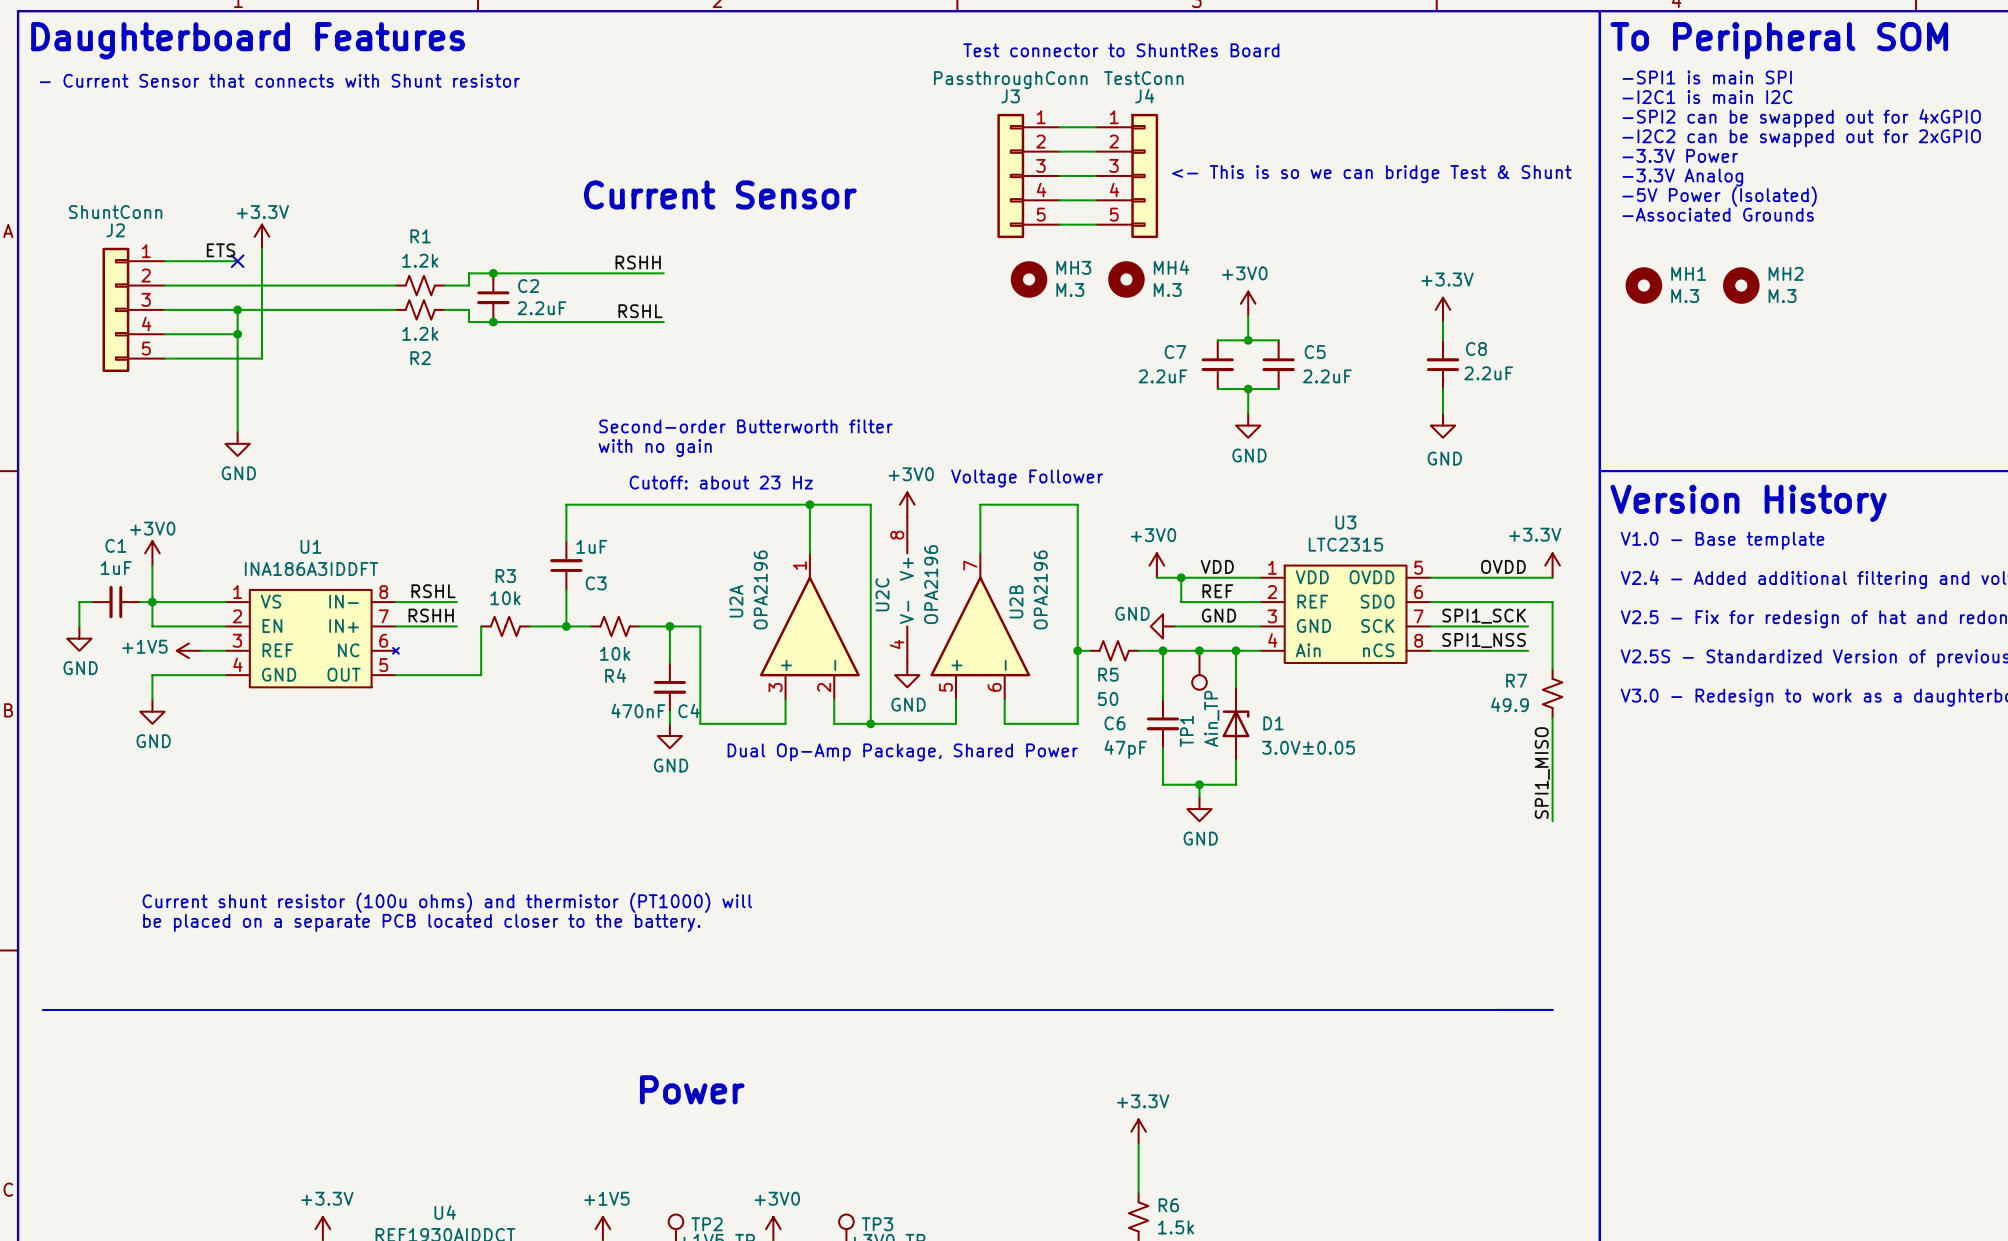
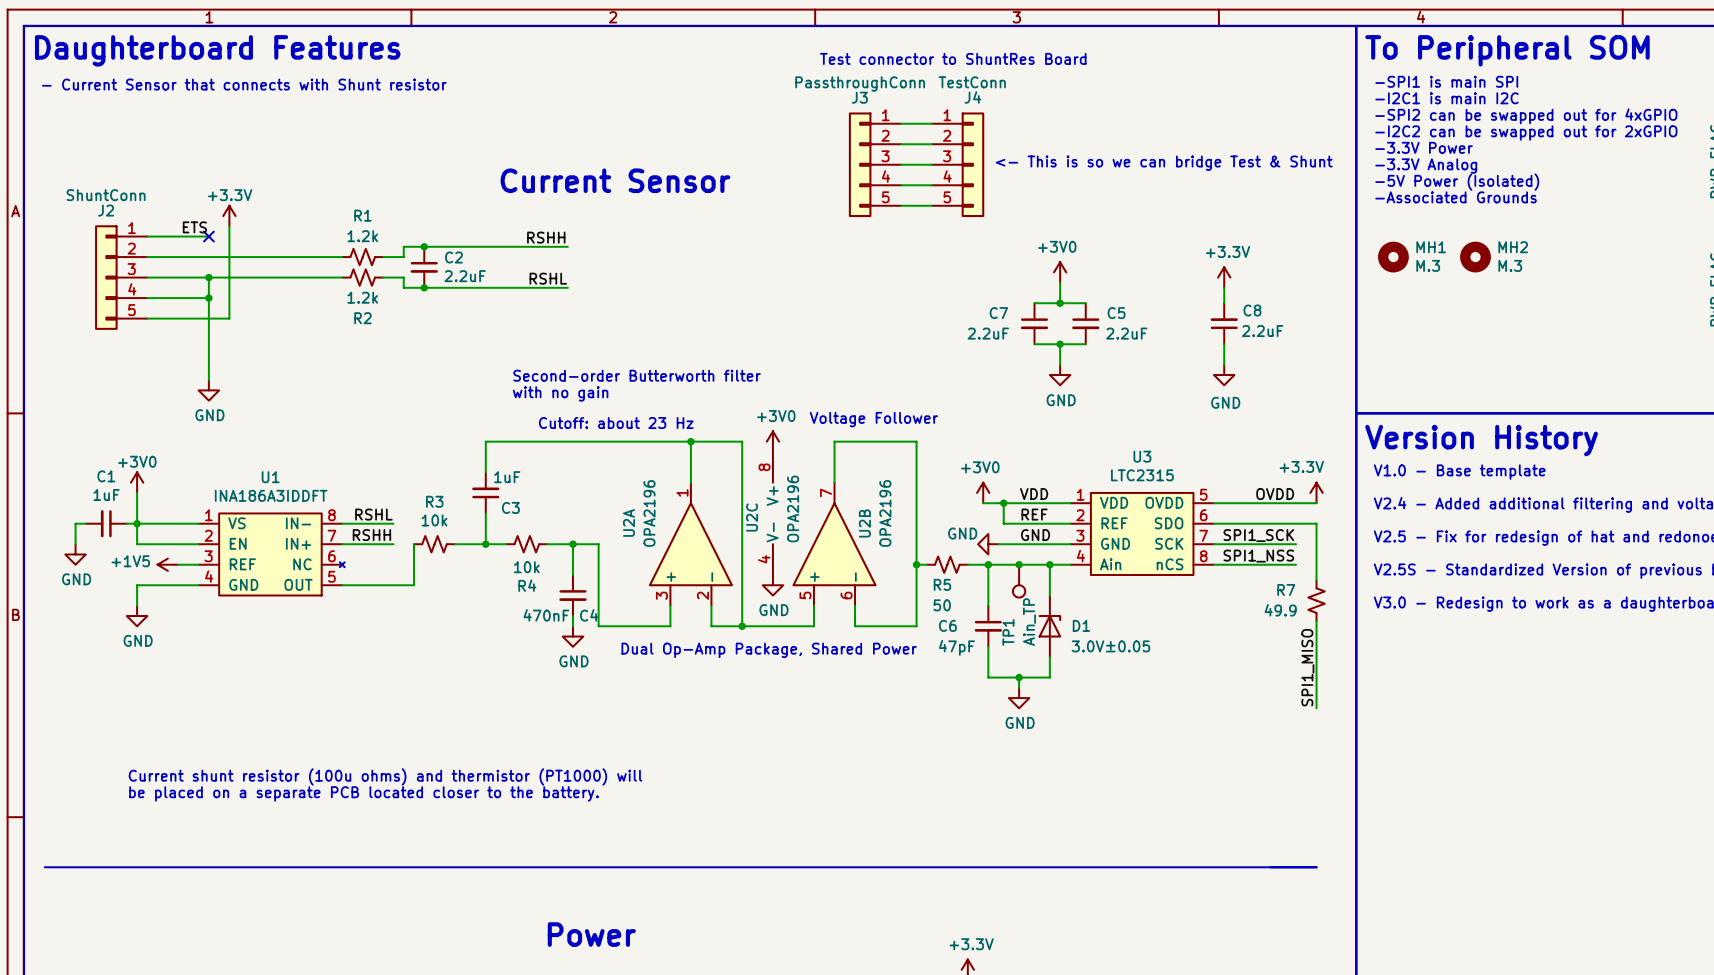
MH3: M.3 (1029, 279) -> none
MH4: M.3 (1126, 279) -> none

